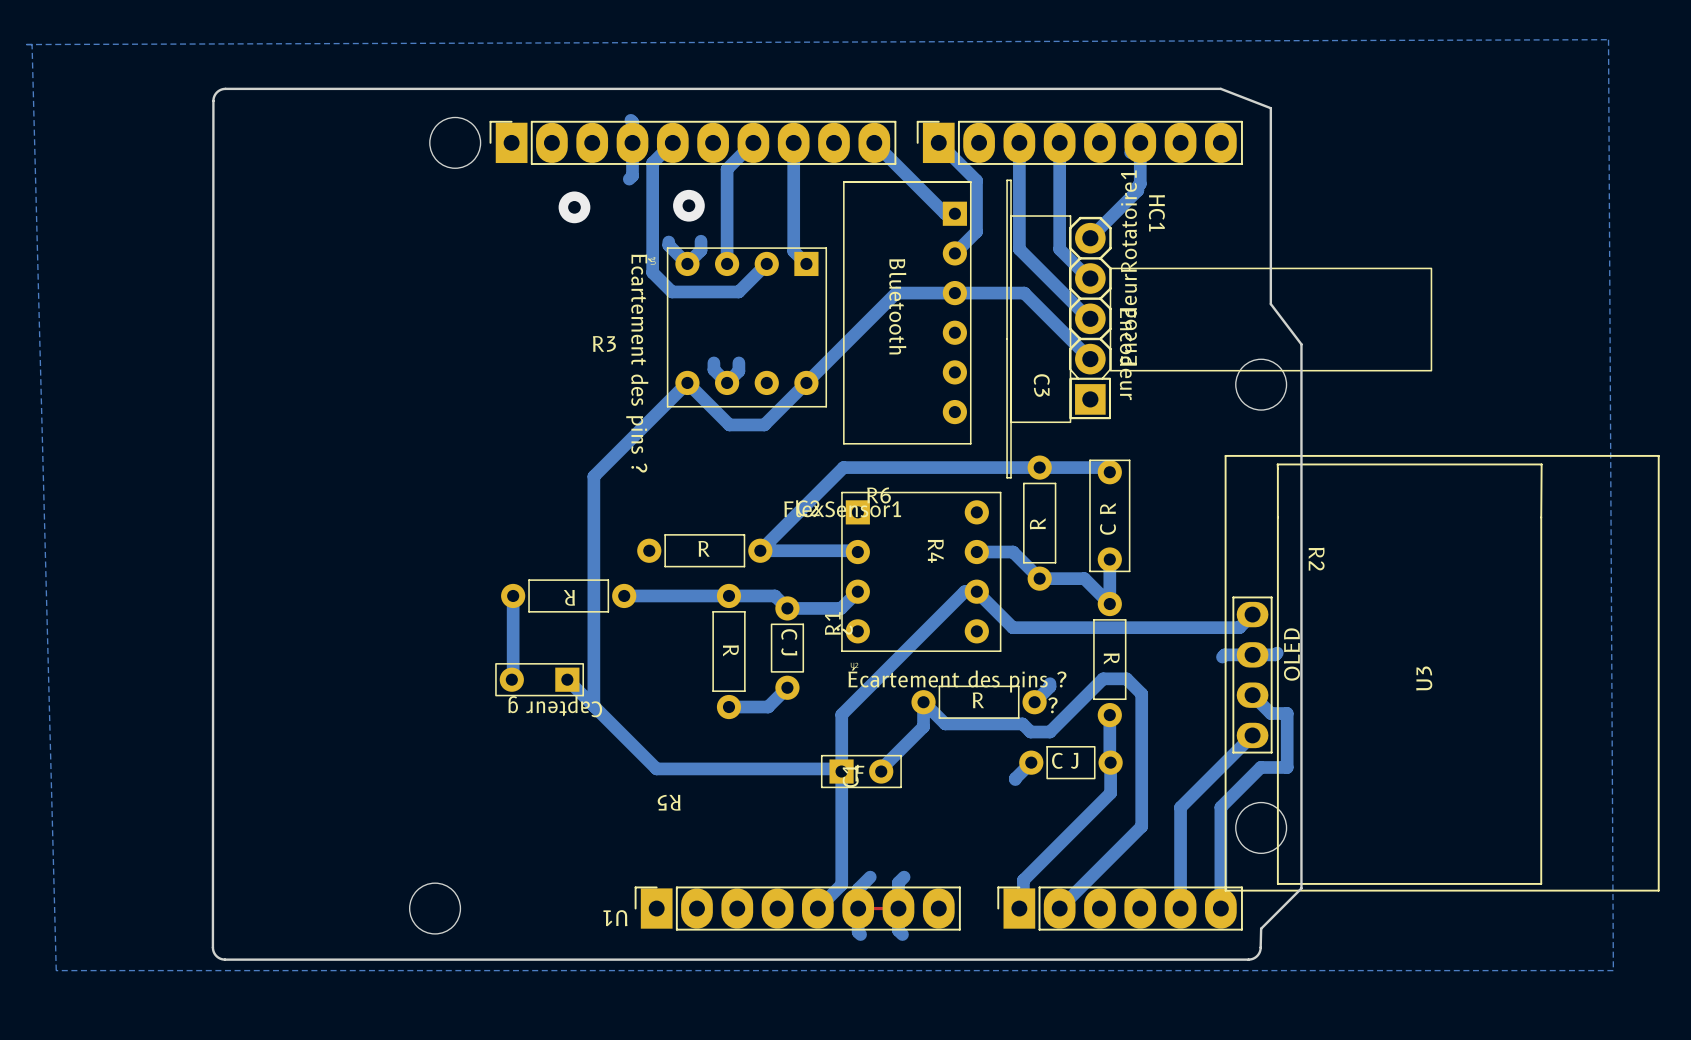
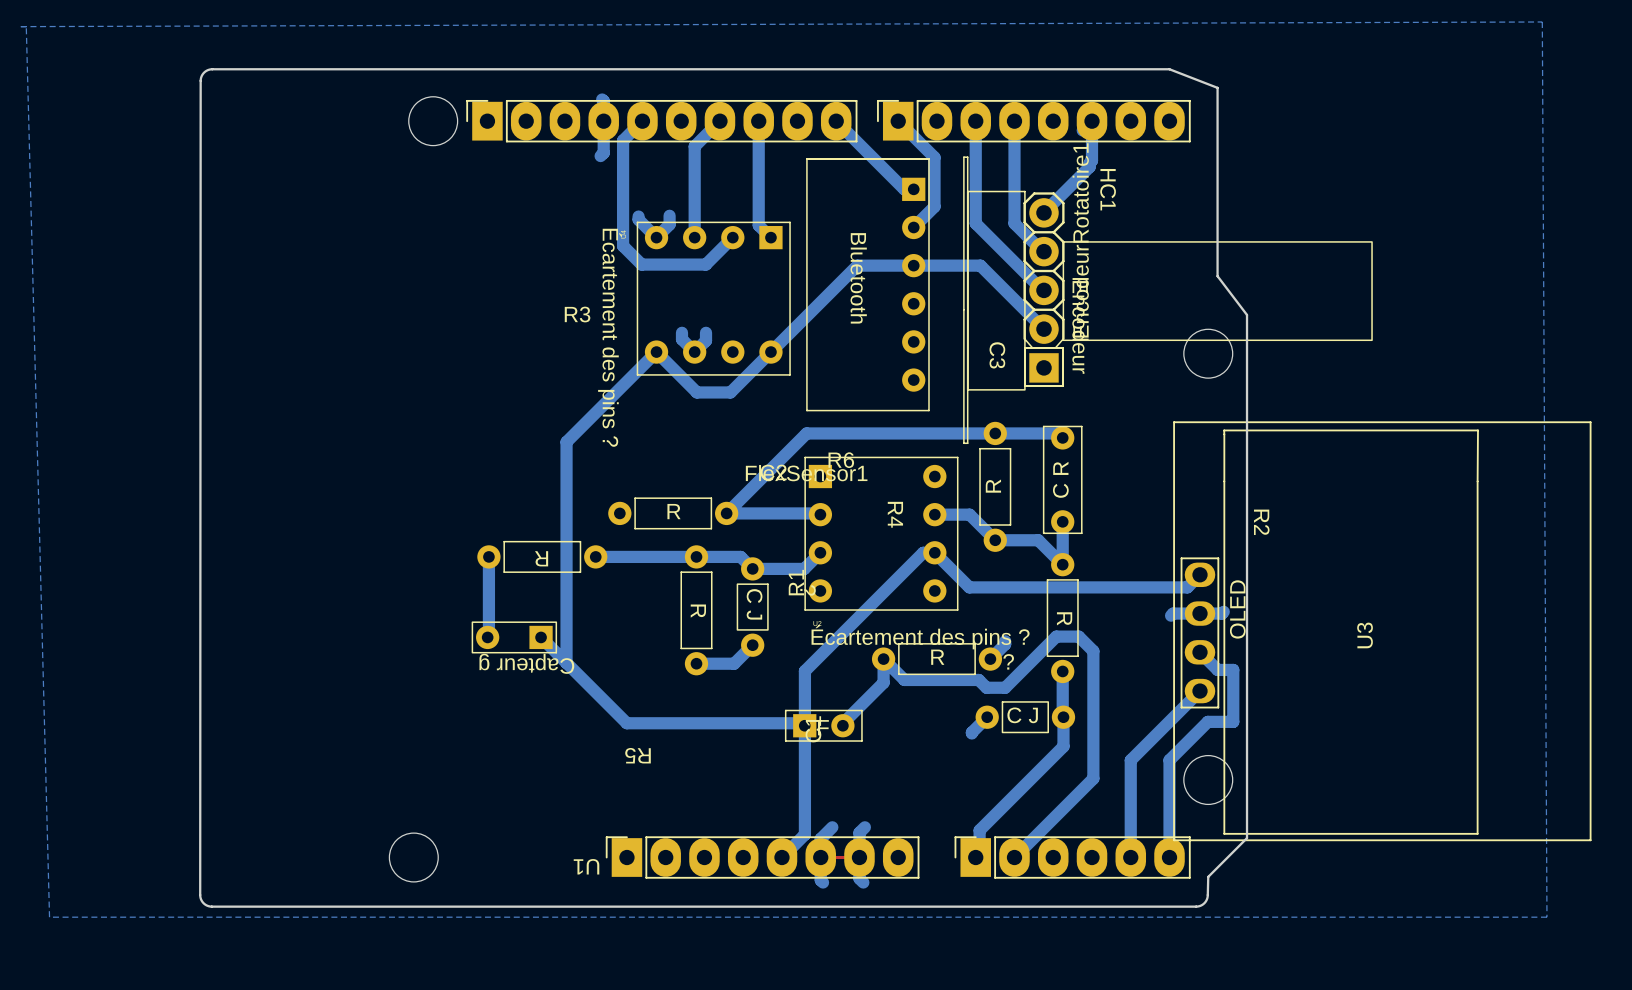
via: (688, 205) -> none
via: (574, 207) -> none

